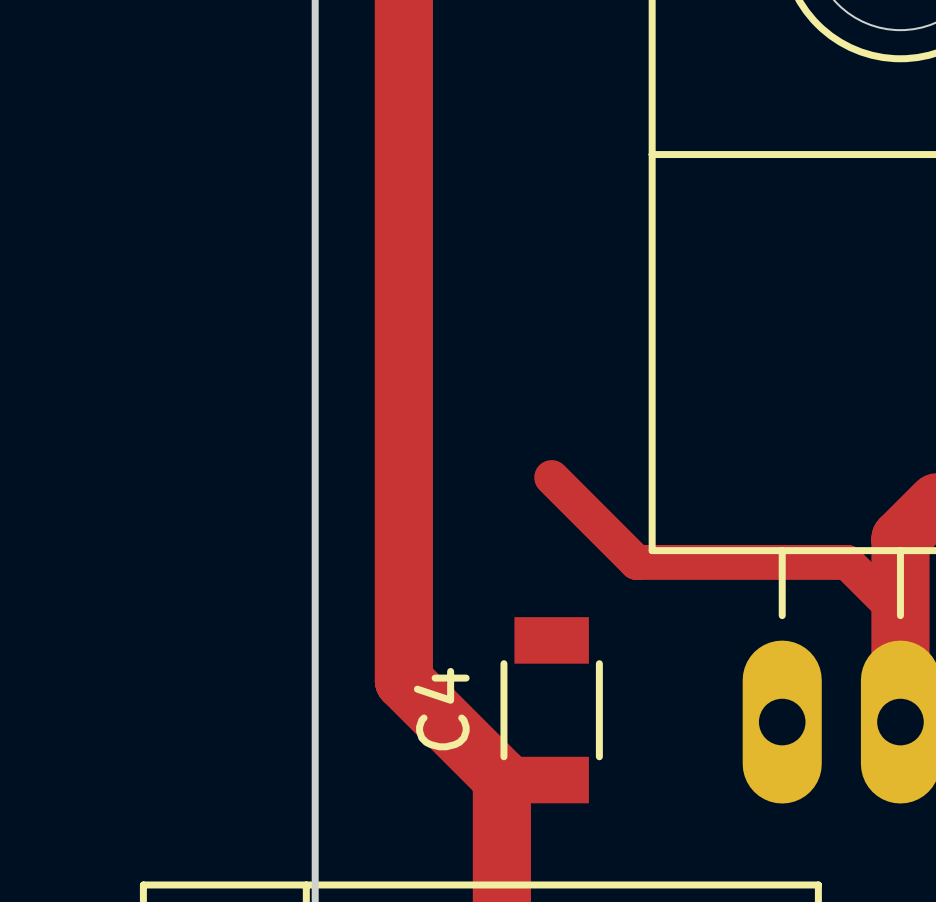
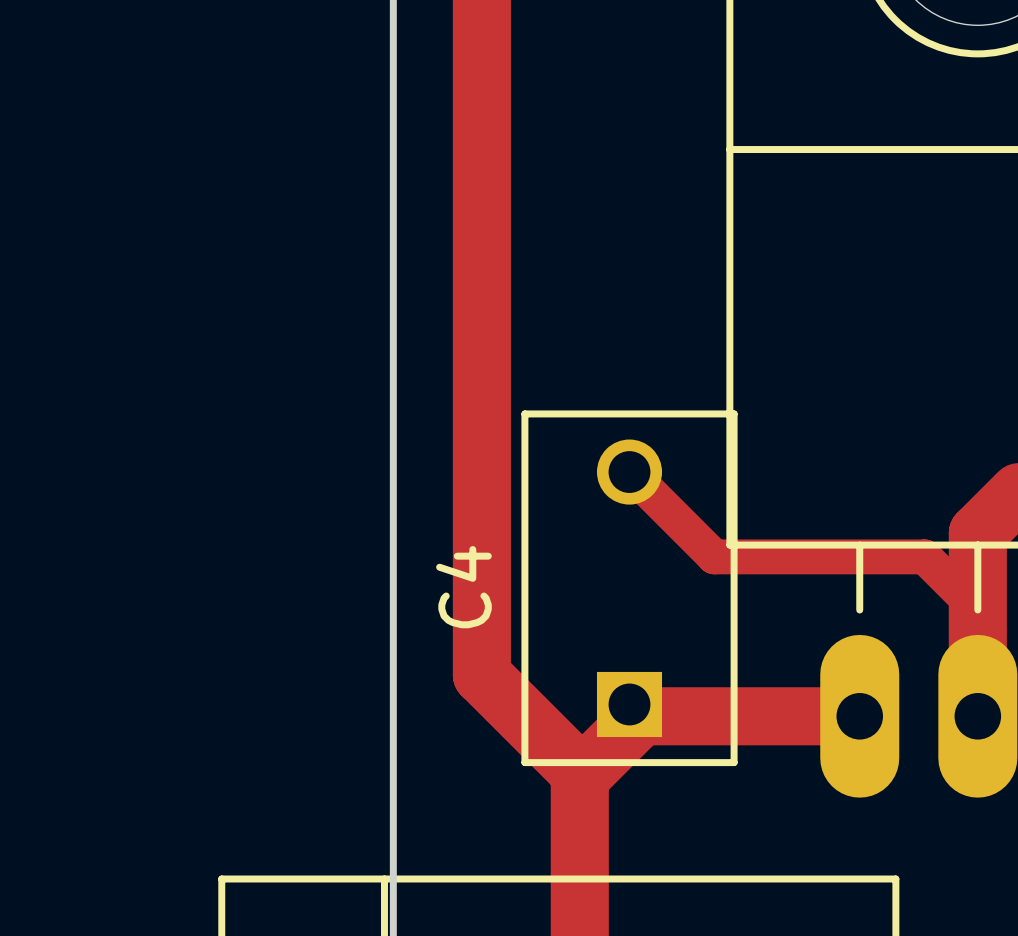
C4 footprint: [500, 617, 603, 804] -> [521, 410, 738, 767]
track: none -> (859, 716) (641, 716) (579, 777)

